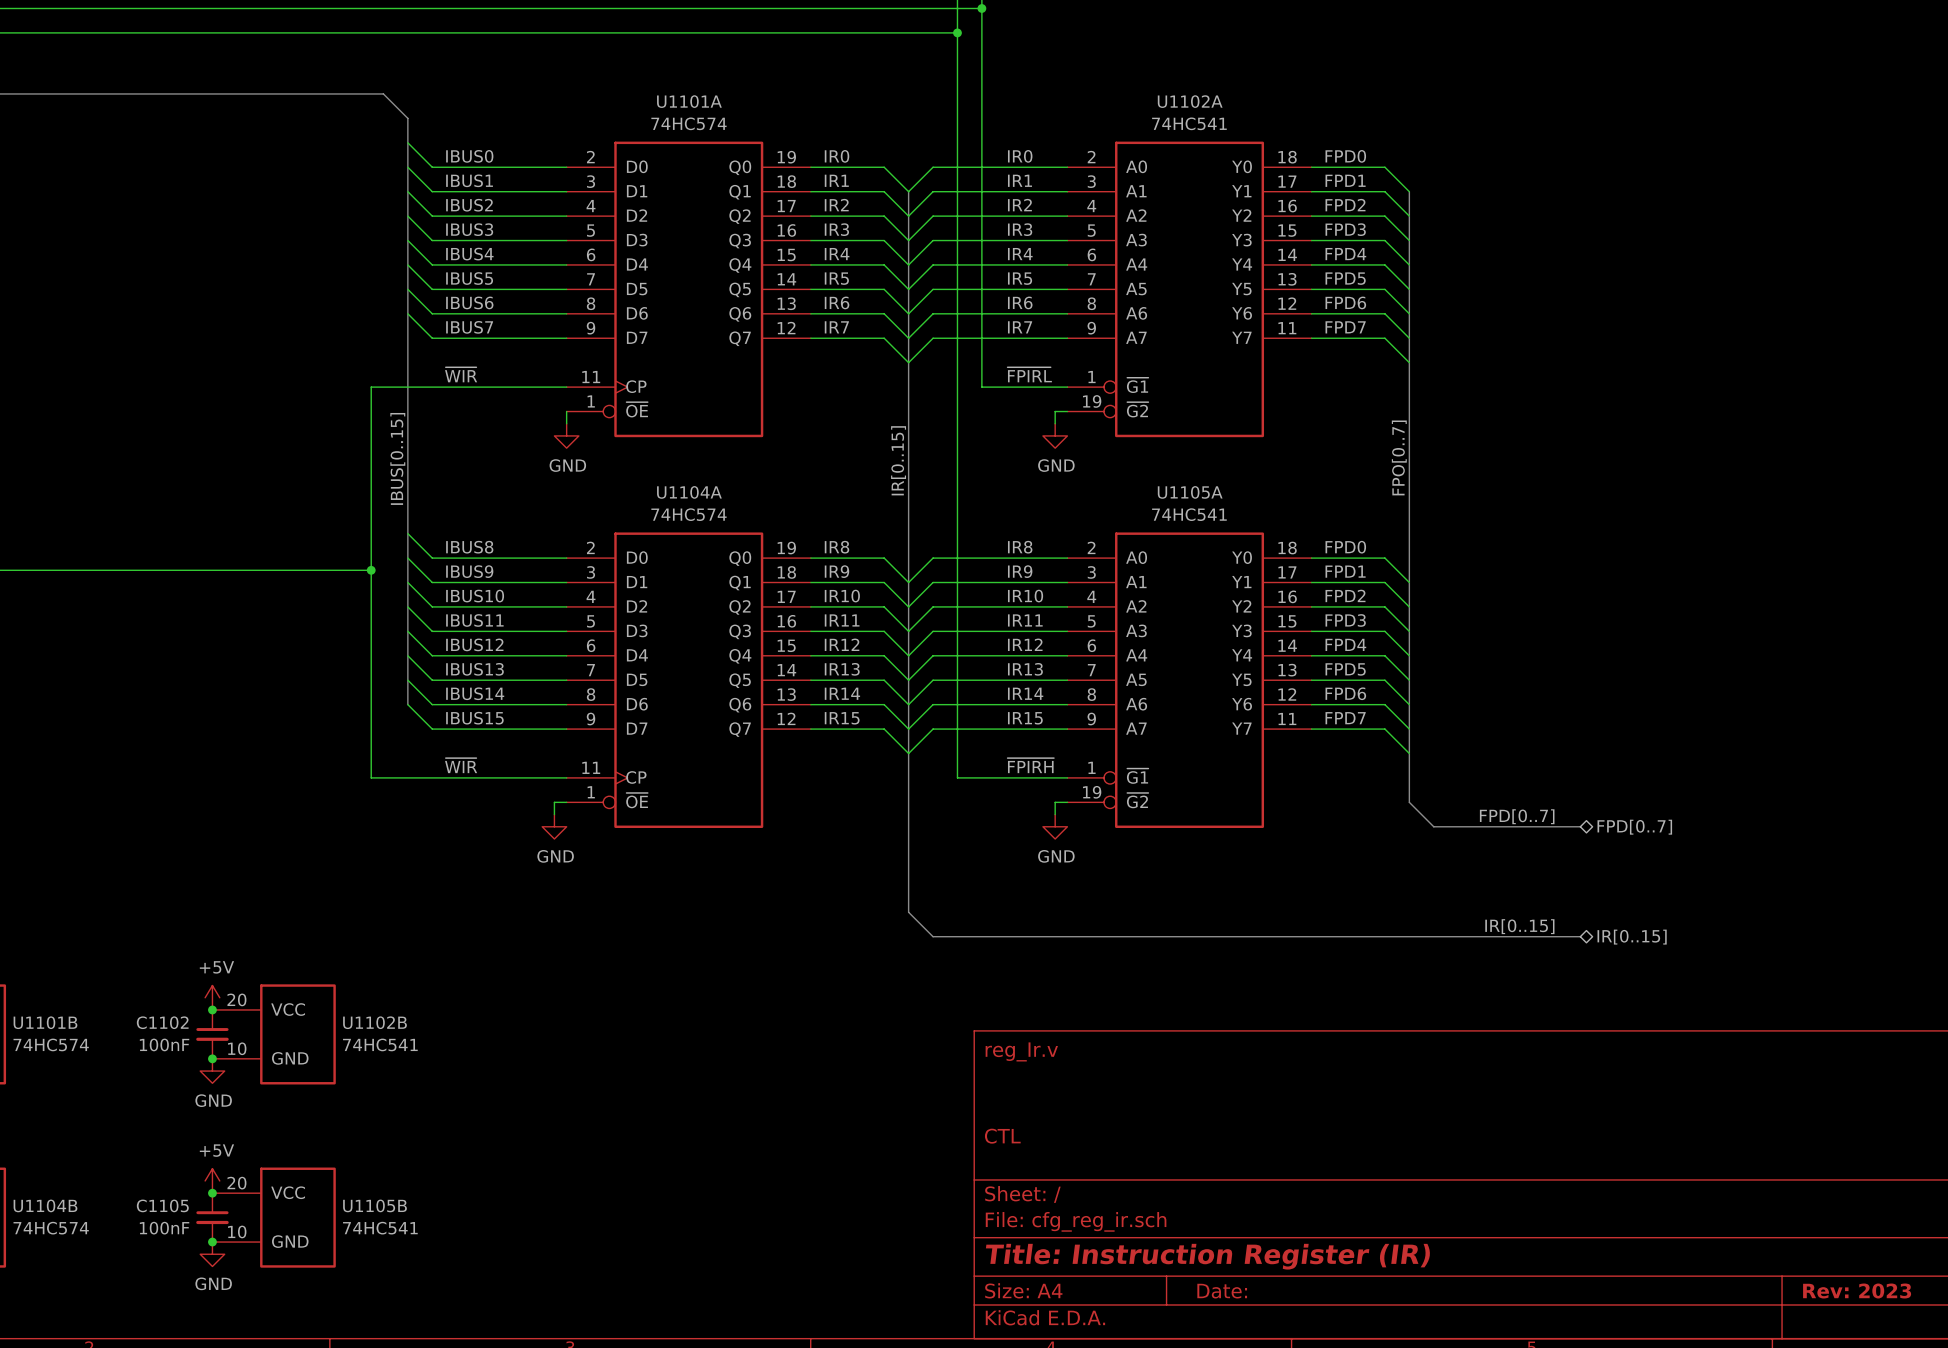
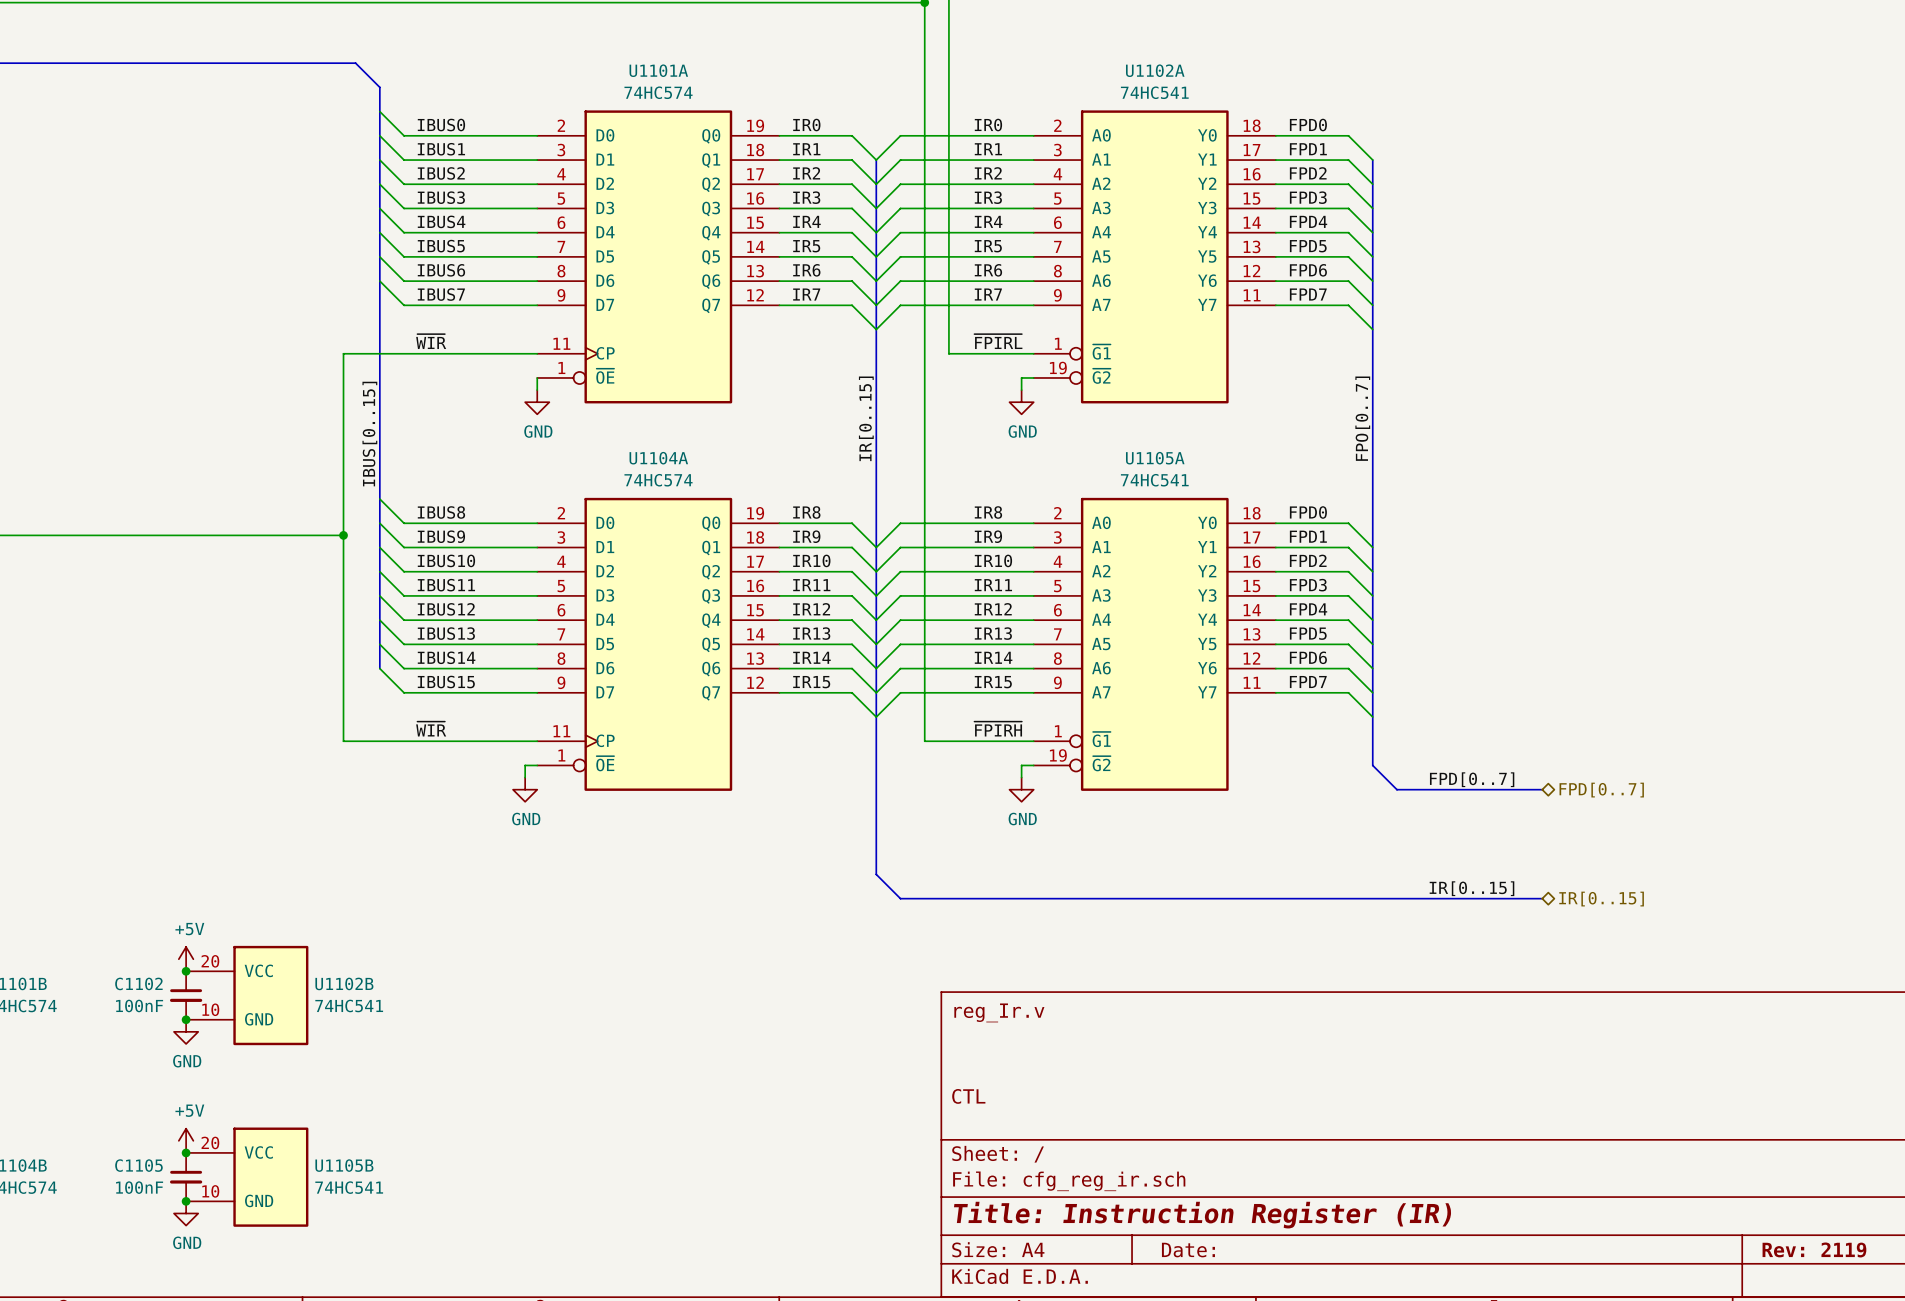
title block: Rev: 2023 (1857, 1291) -> Rev: 2119 (1814, 1249)

